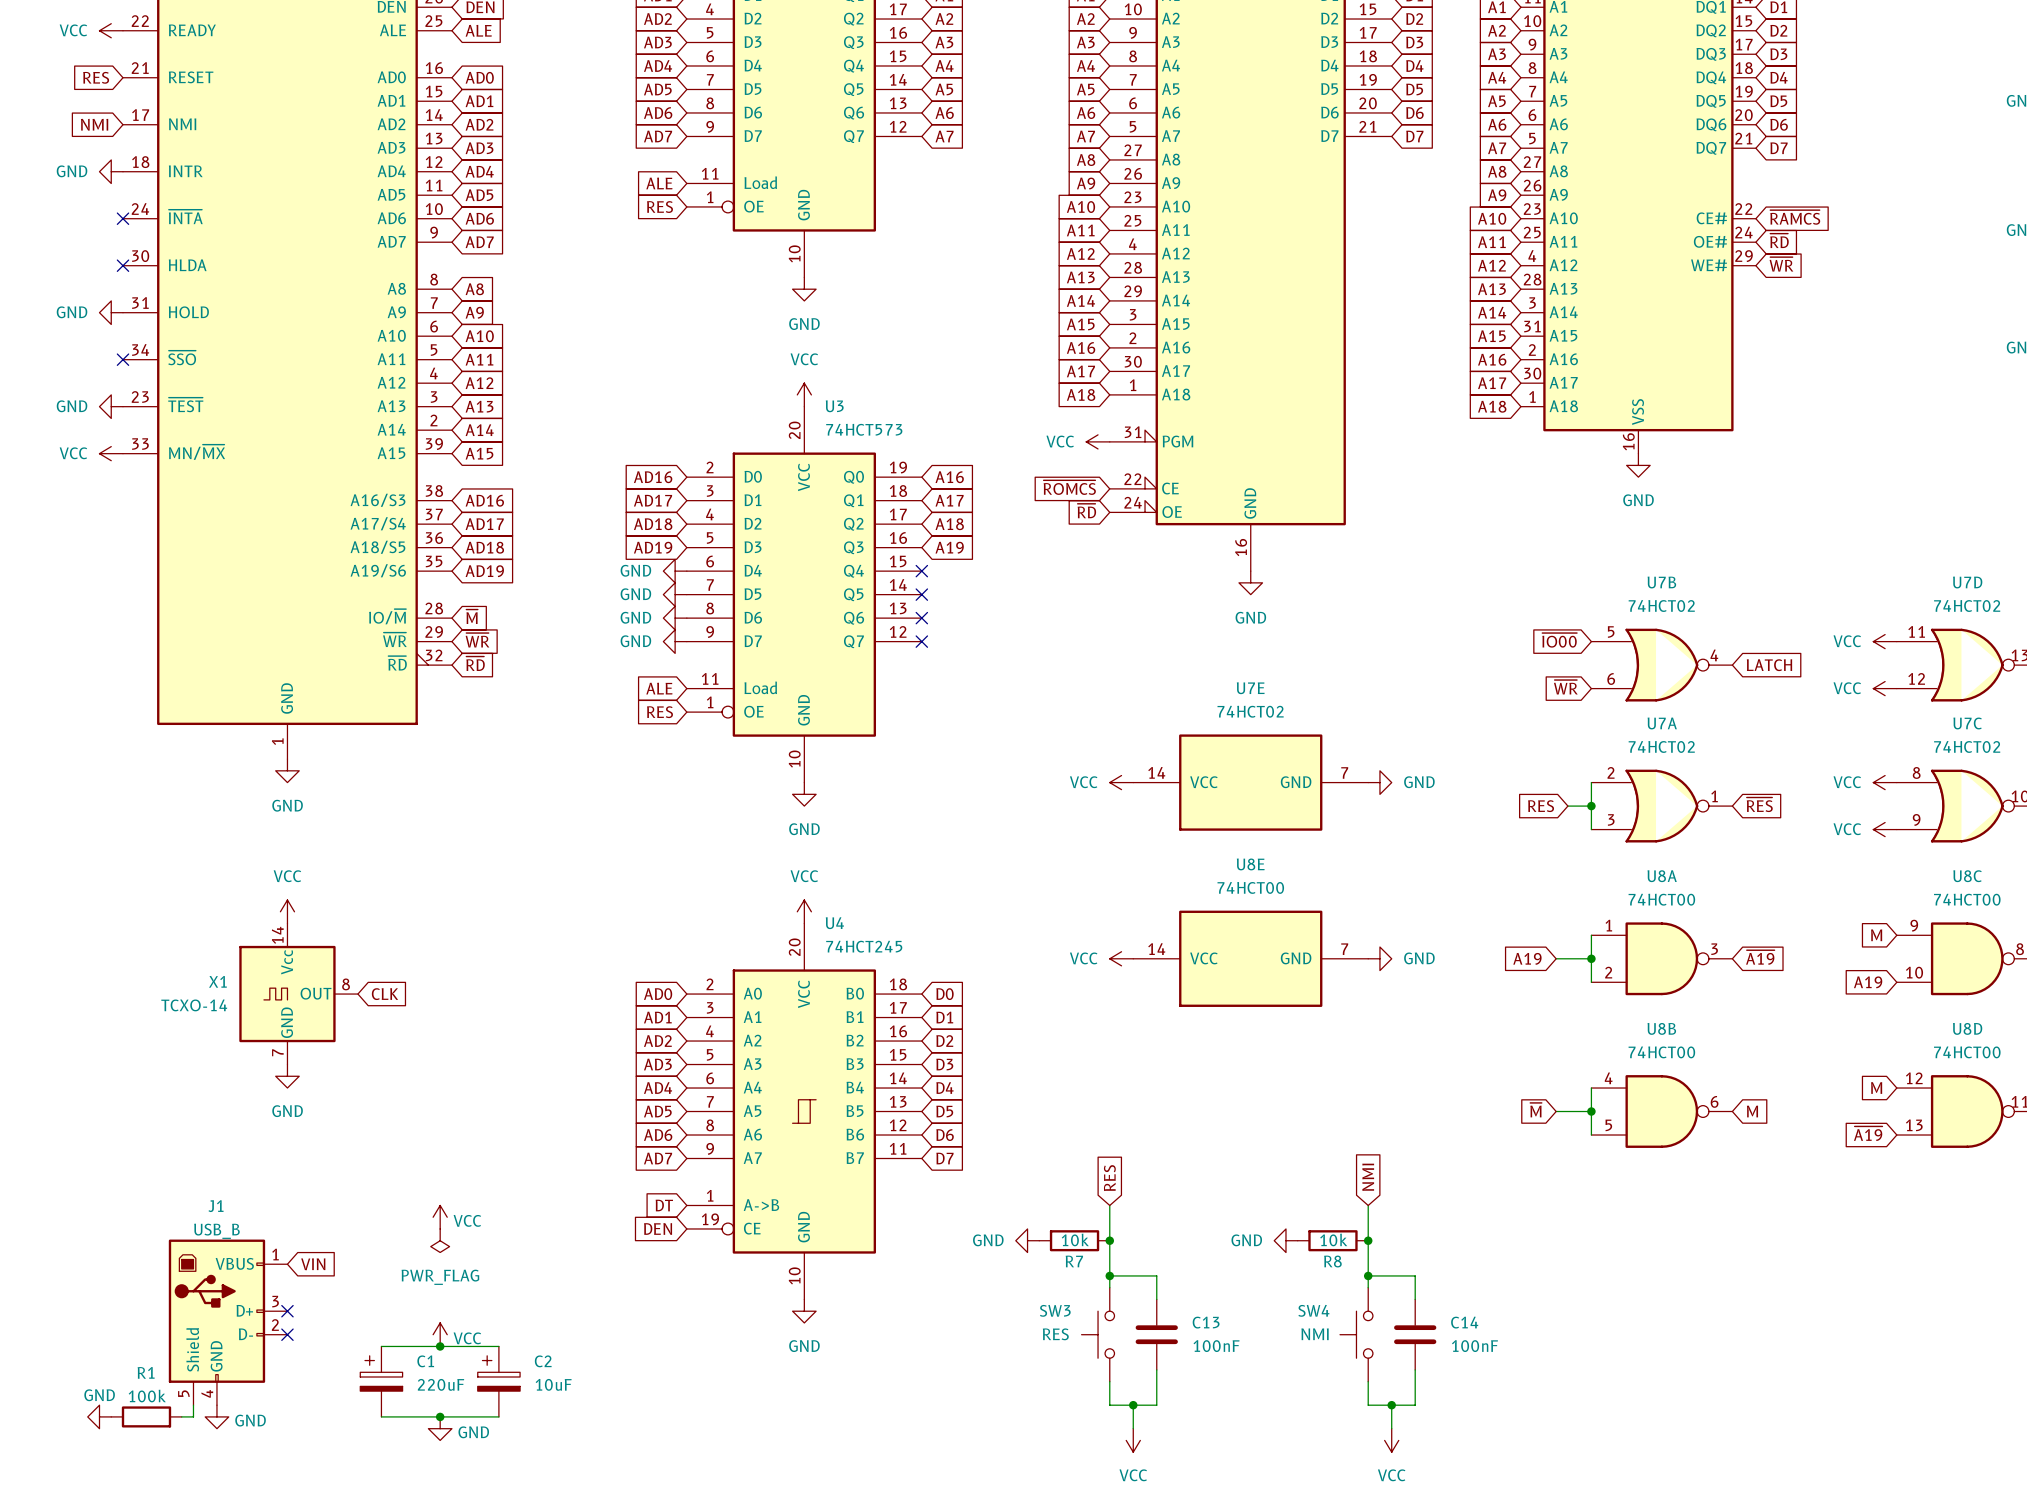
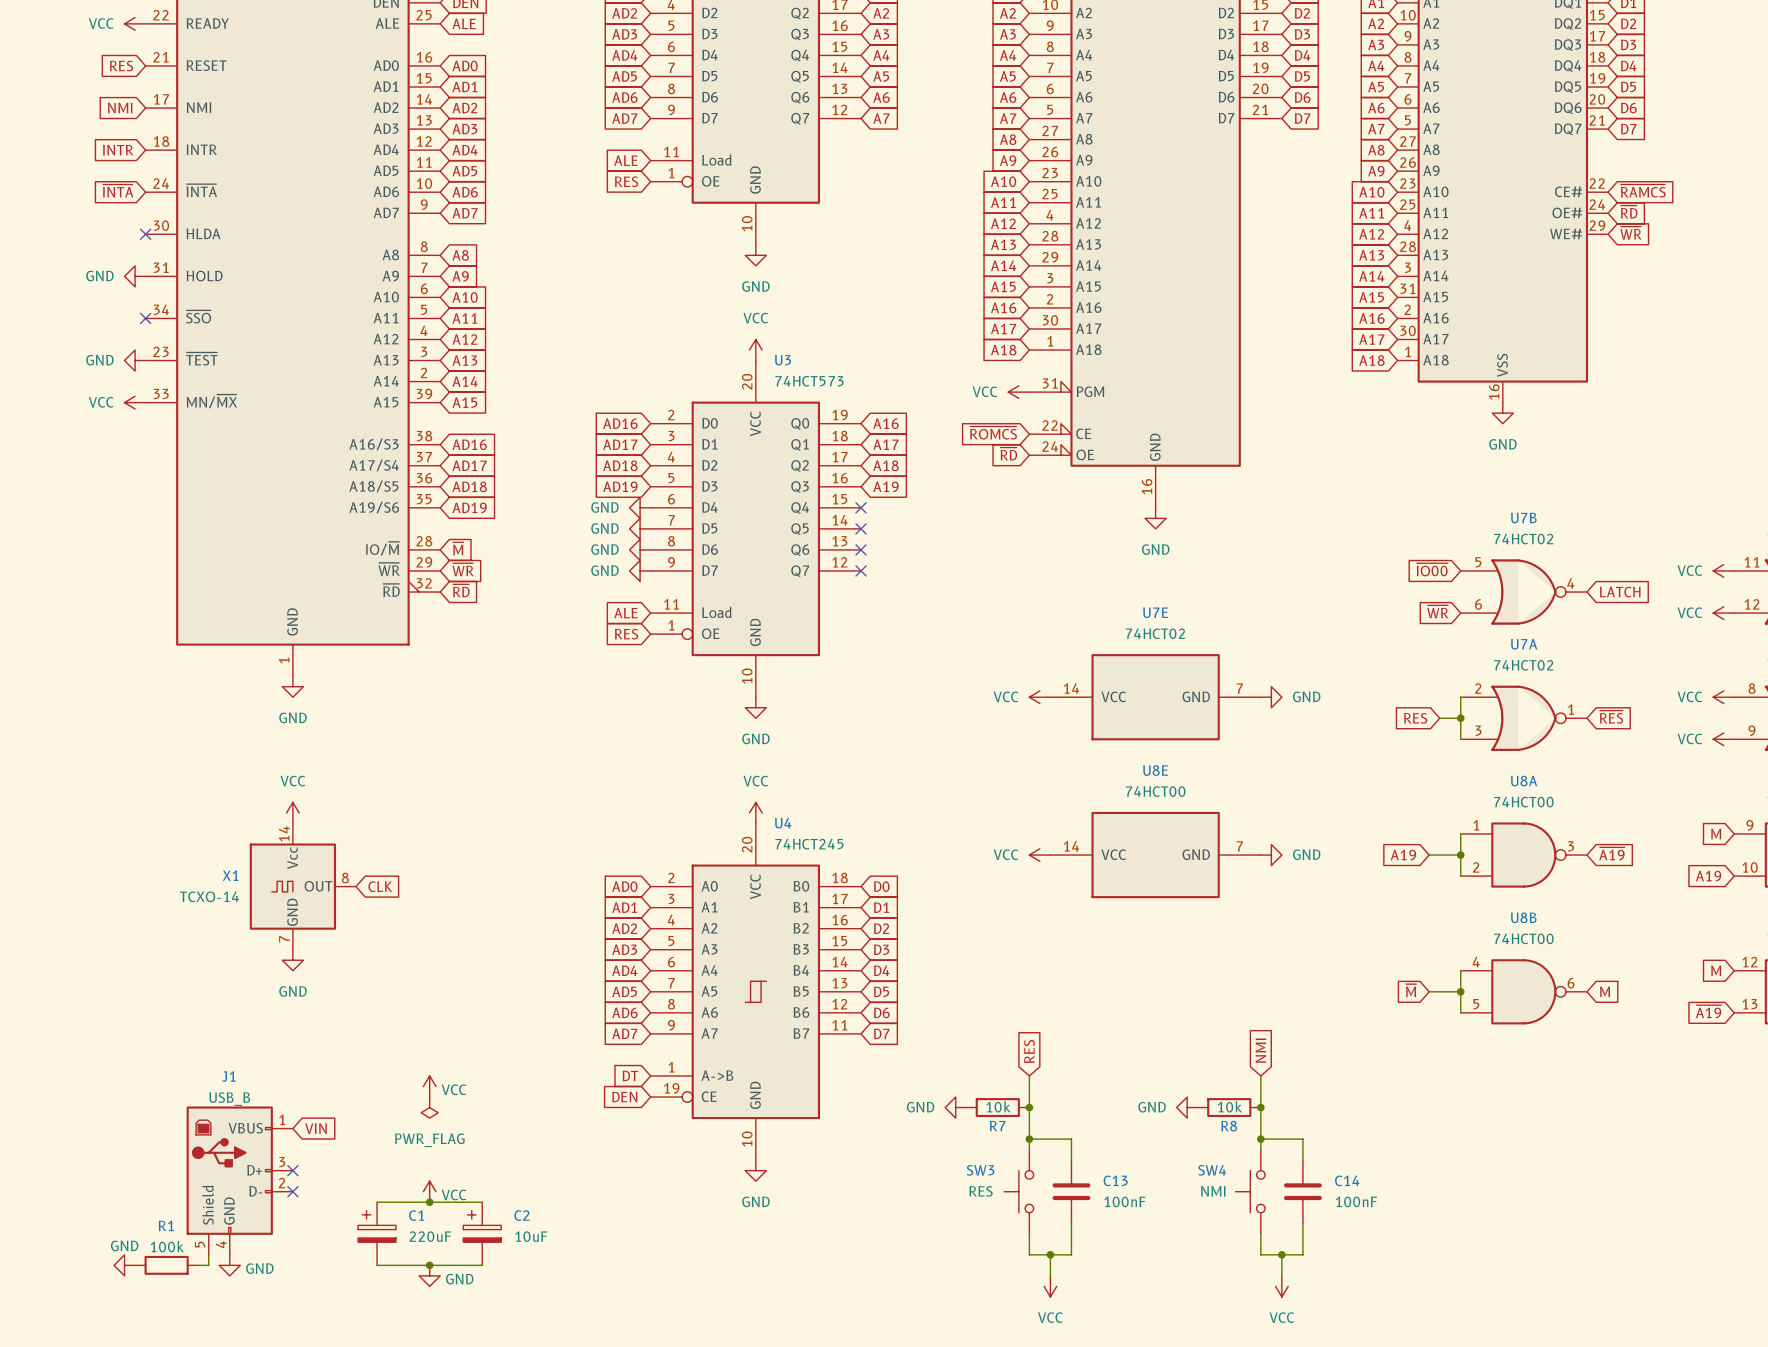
global label: none -> INTR (118, 150)
power symbol: GND (111, 171) -> none
global label: none -> ~{INTA} (118, 190)
no-connect mark: (122, 218) -> none

